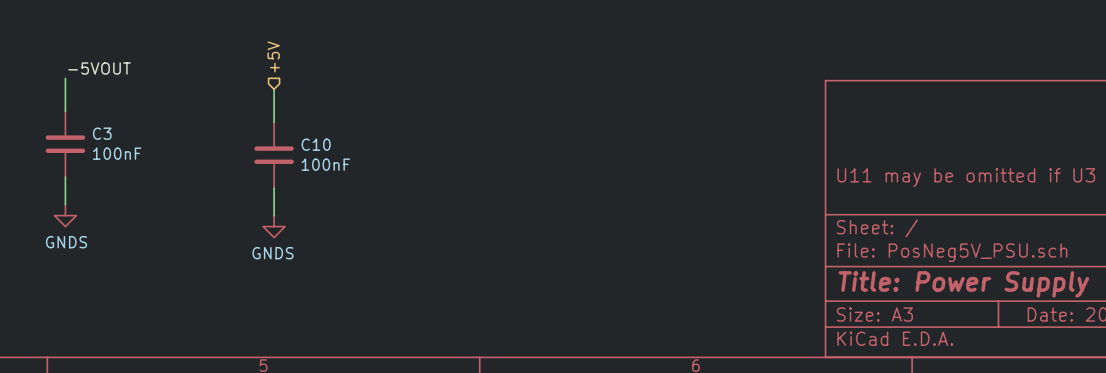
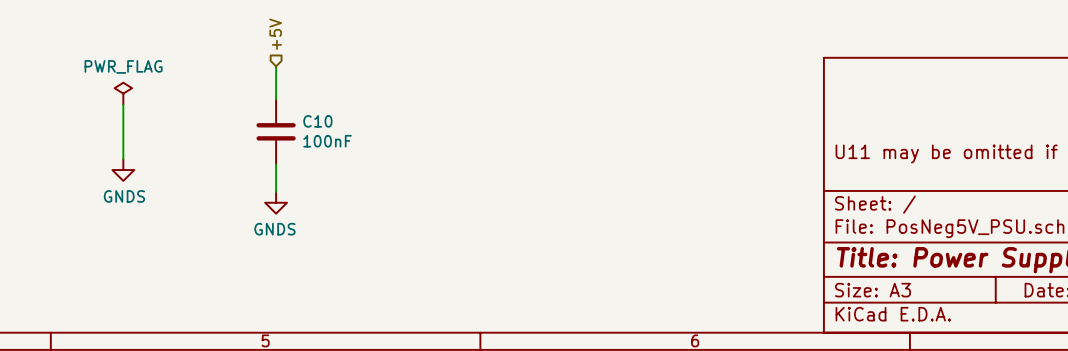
label: -5VOUT (99, 68) -> none
wire: (65, 78) (65, 111) -> none
power symbol: none -> PWR_FLAG (123, 93)
wire: none -> (123, 104) (123, 159)
C3: 100nF (65, 144) -> none
wire: (65, 177) (65, 204) -> none
power symbol position: GNDS (65, 215) -> GNDS (123, 170)

